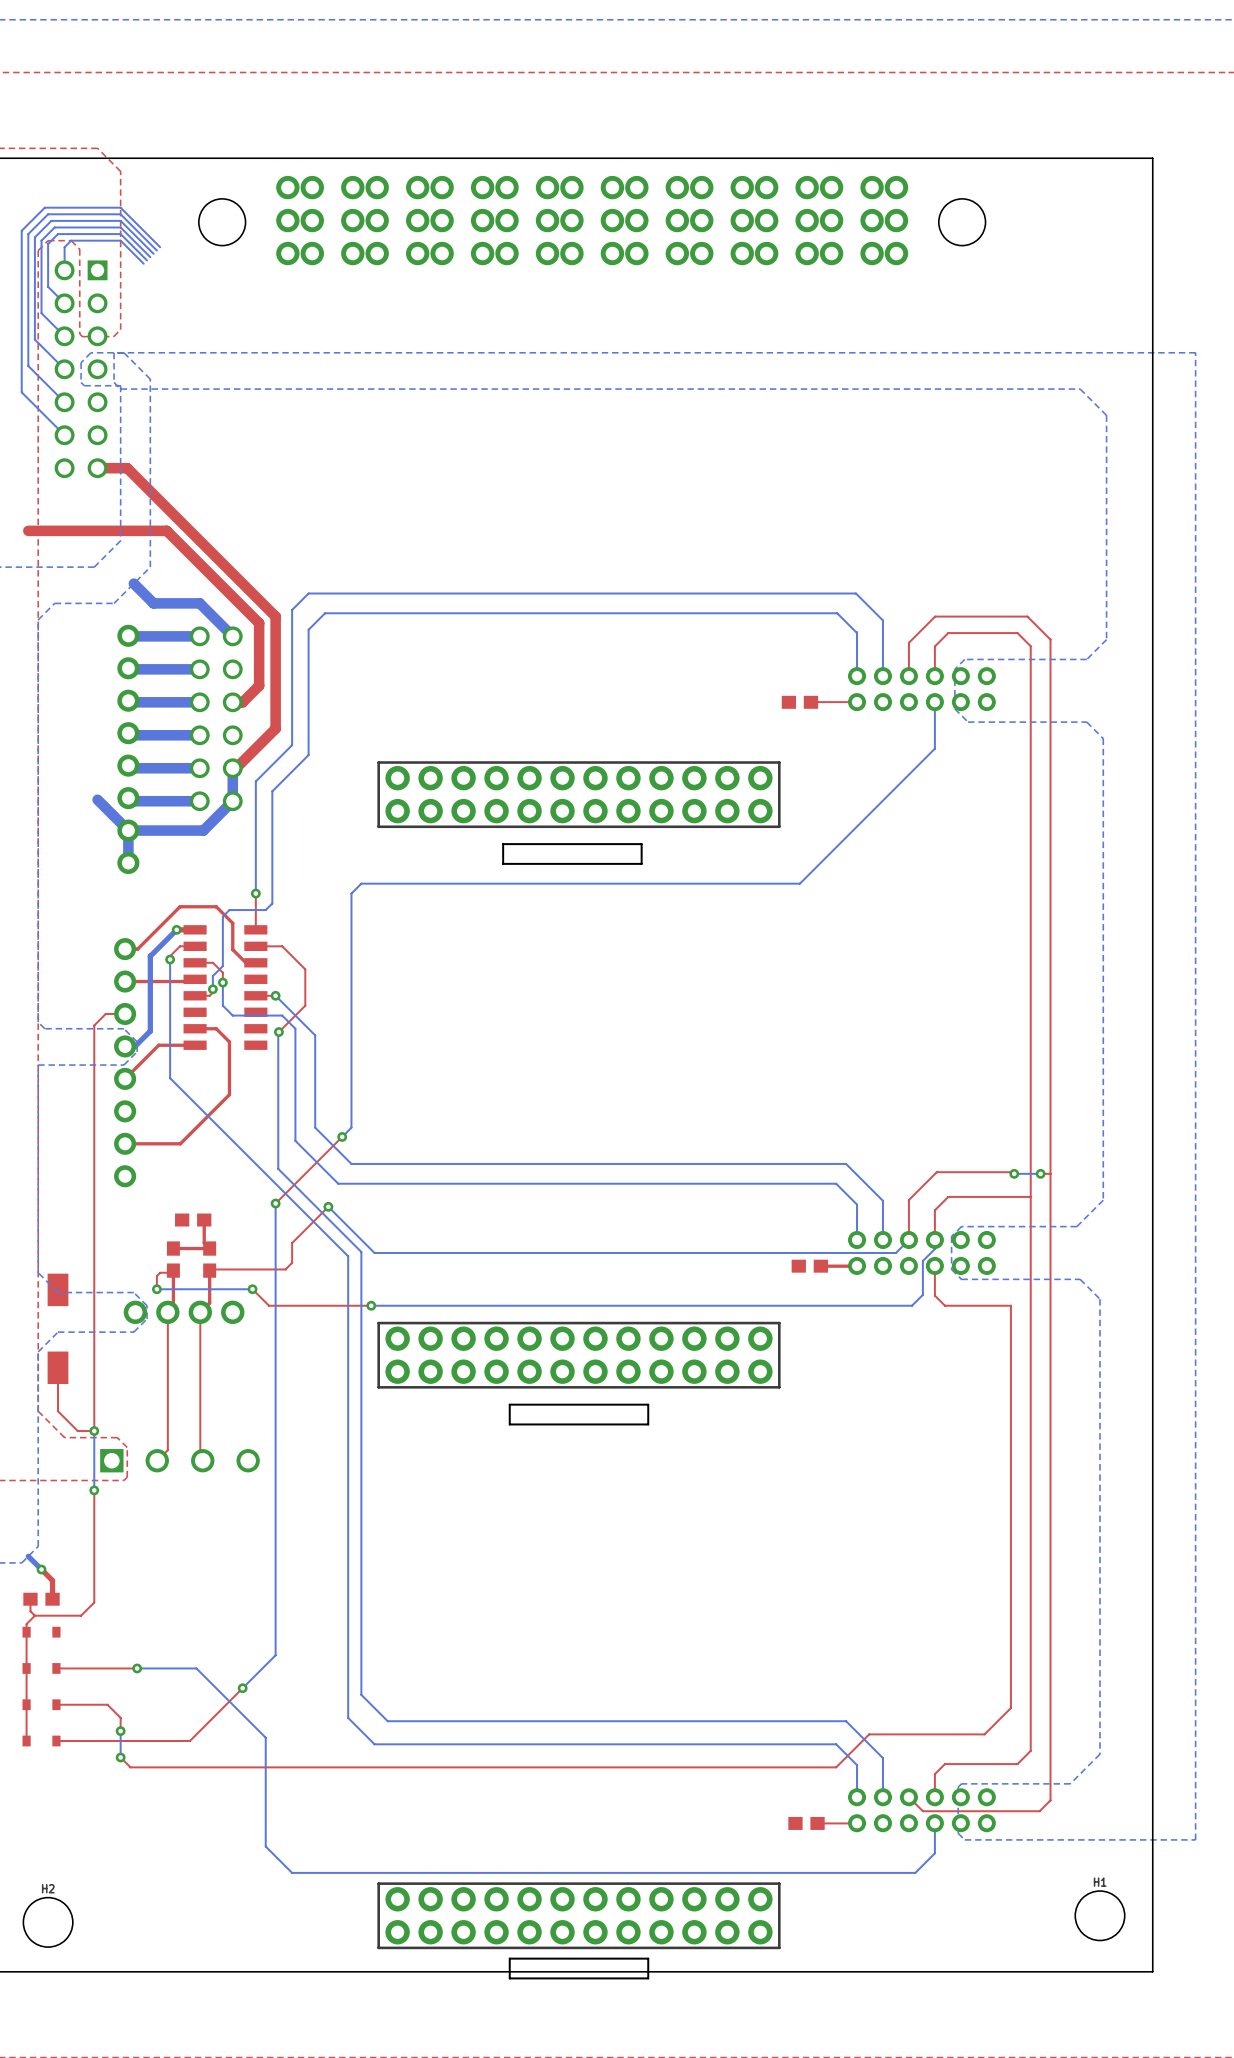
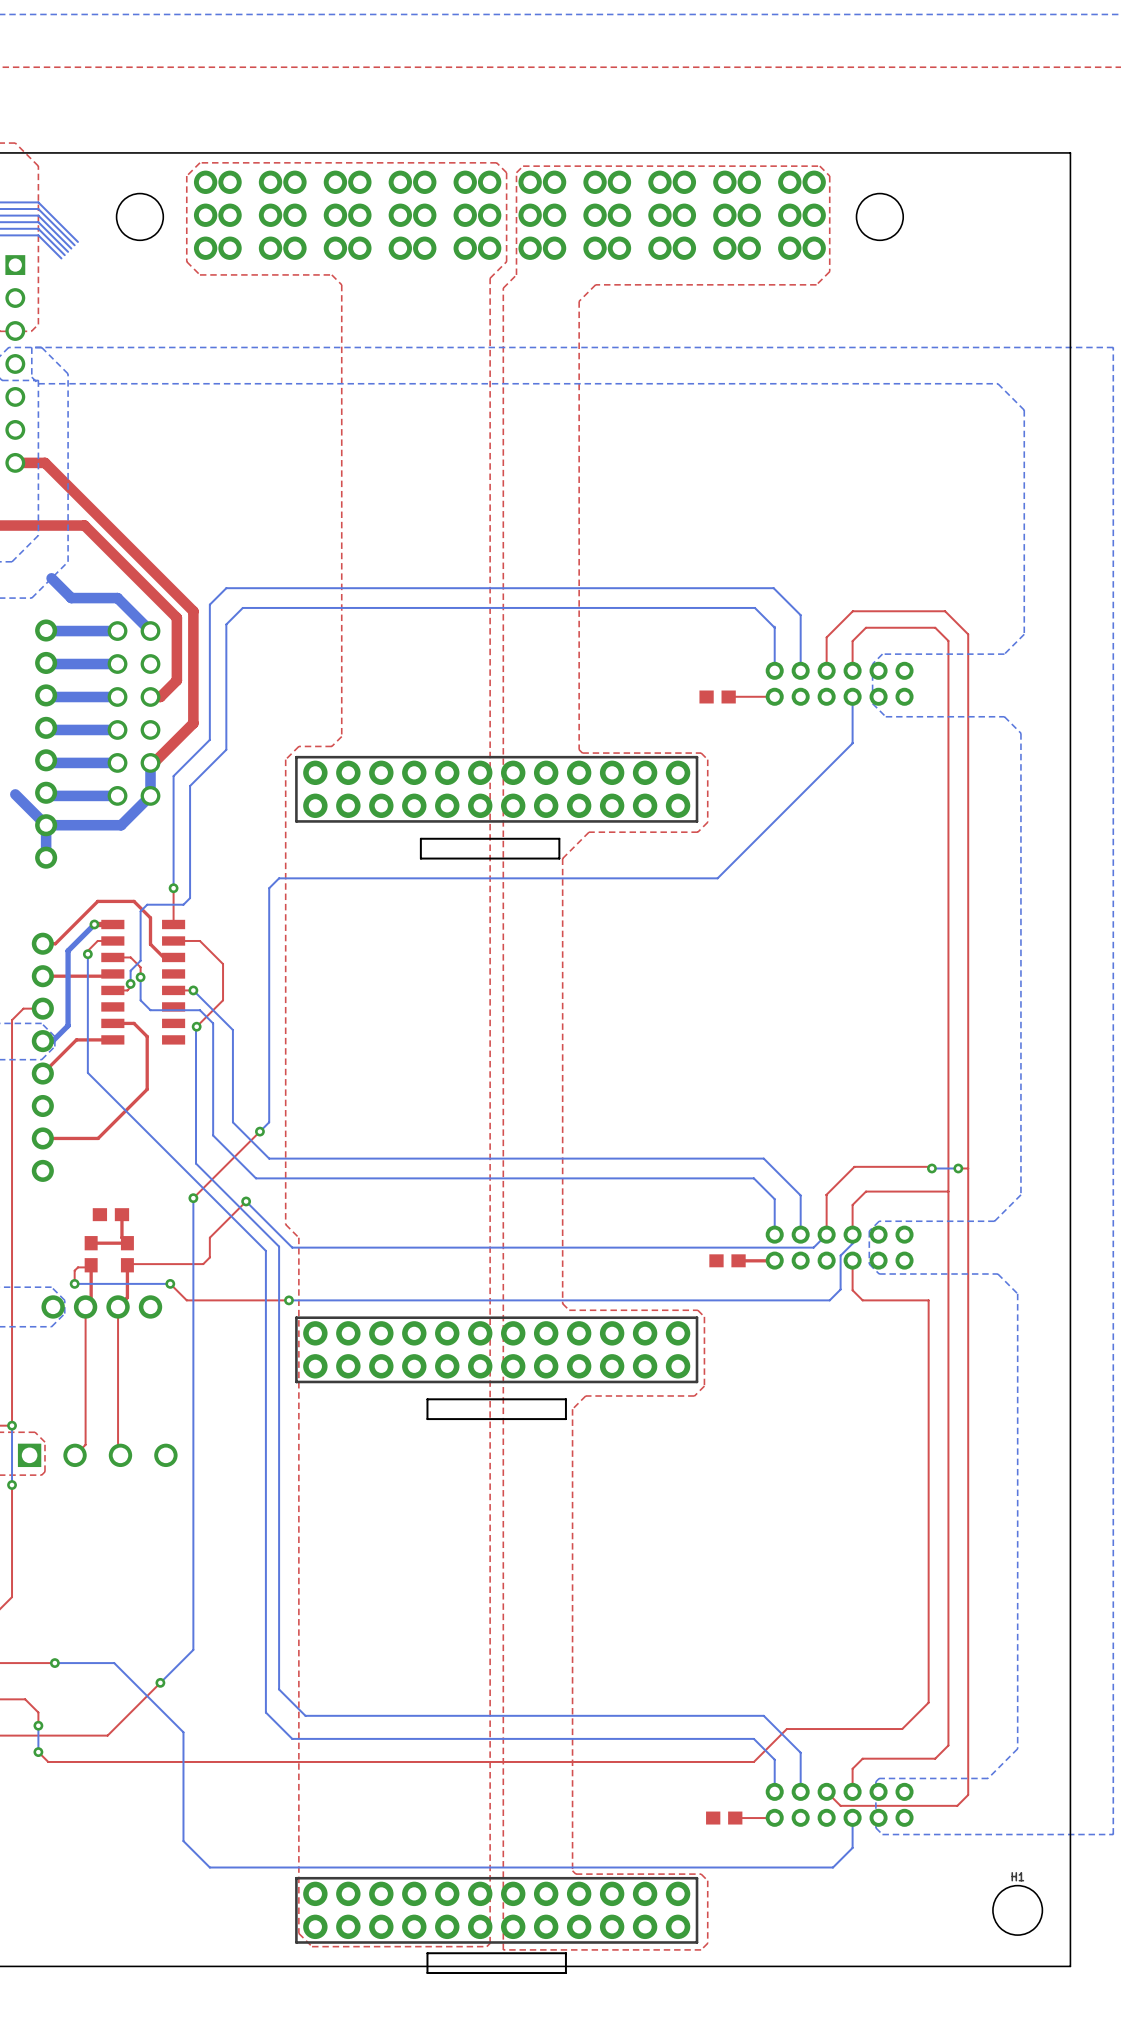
top zone outline: none -> (496, 162) (506, 172) (506, 261) (490, 278) (490, 1943) (486, 1946) (312, 1946) (298, 1933) (298, 1237) (285, 1224) (285, 759) (298, 746) (331, 746) (341, 736) (341, 284) (331, 274) (199, 274) (186, 261) (186, 176) (199, 162) (496, 162)
top zone outline: none -> (819, 166) (523, 166) (516, 172) (516, 274) (503, 288) (503, 1949) (701, 1949) (707, 1943) (707, 1880) (701, 1874) (575, 1874) (572, 1870) (572, 1409) (585, 1396) (694, 1396) (704, 1386) (704, 1316) (697, 1310) (569, 1310) (562, 1303) (562, 858) (589, 832) (697, 832) (707, 822) (707, 759) (701, 753) (582, 753) (579, 749) (579, 301) (595, 284) (816, 284) (829, 271) (829, 176) (819, 166)

